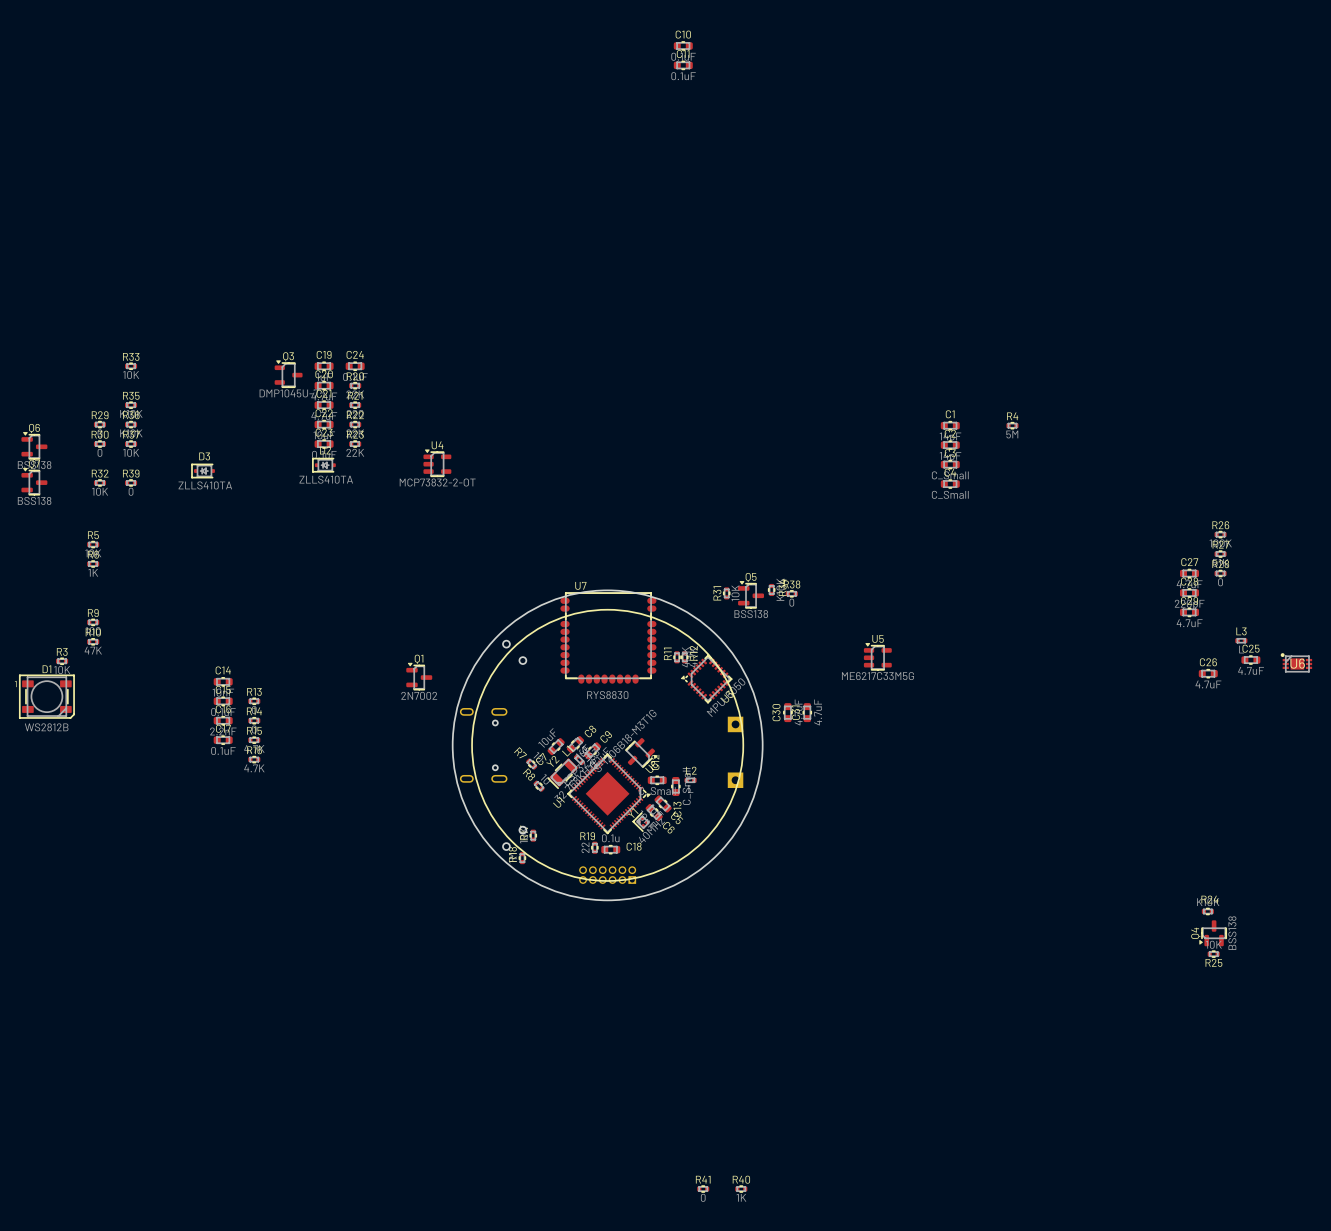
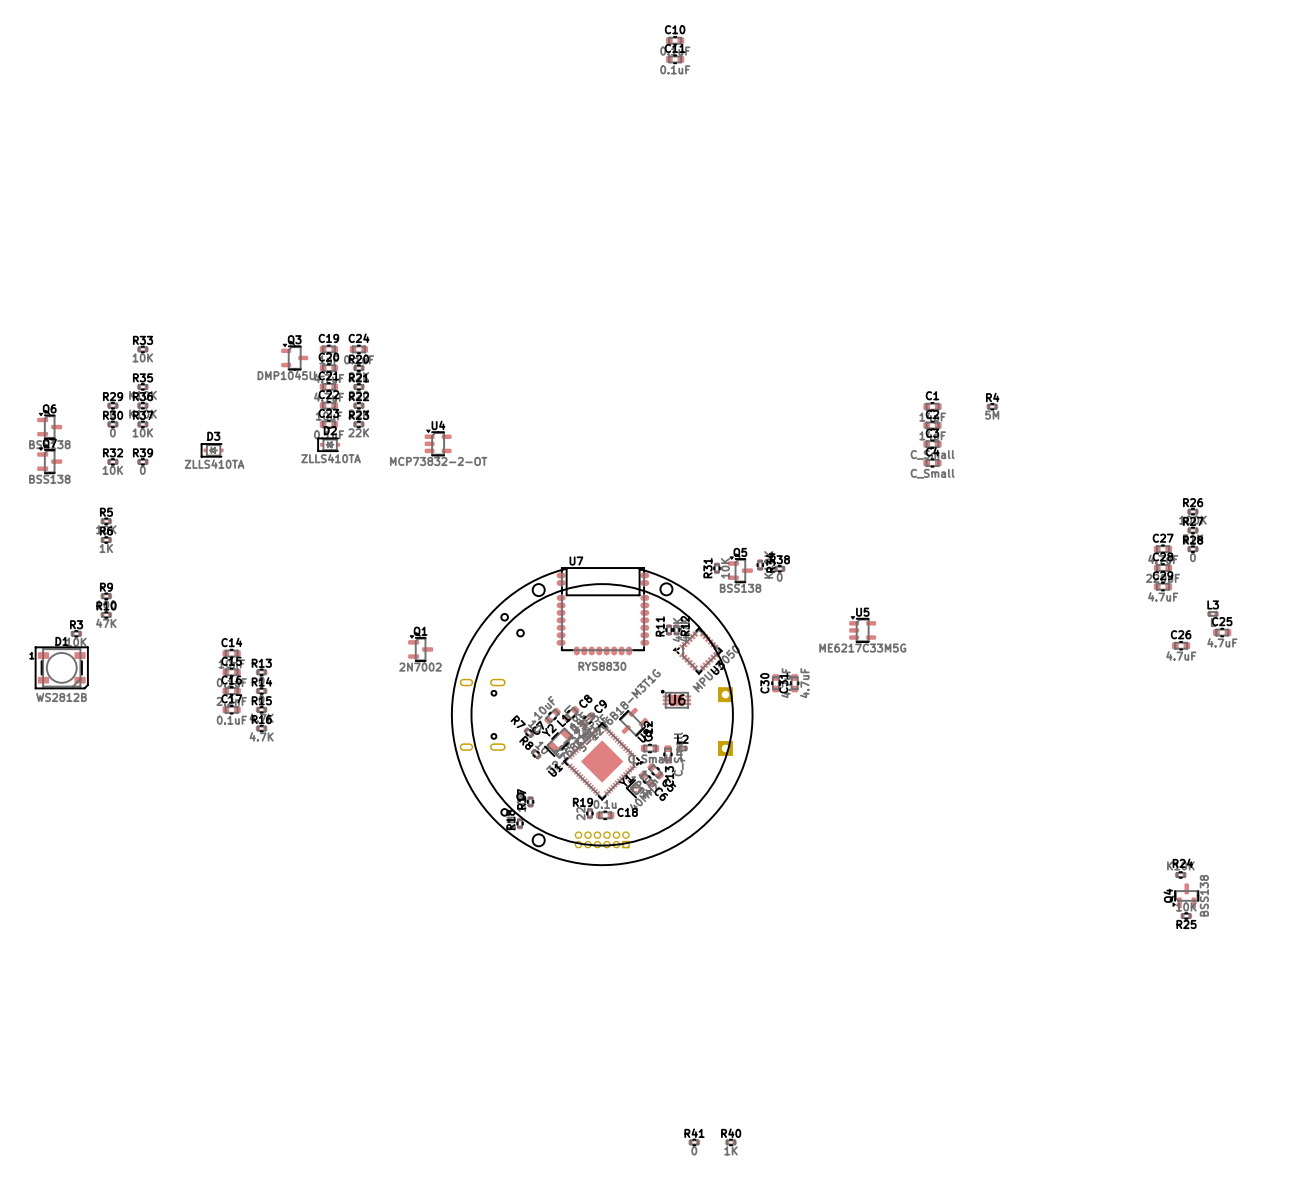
round board edge: [451, 589, 764, 902] -> none
board edge: none -> (566, 568) (566, 595) (639, 595) (639, 569) (664, 577) (679, 585) (700, 601) (724, 626) (741, 657) (748, 682) (752, 716) (749, 742) (742, 767) (727, 798) (710, 819) (683, 841) (660, 853) (635, 861) (601, 865) (575, 862) (550, 855) (526, 844) (505, 829) (481, 804) (464, 774) (455, 749) (452, 723) (452, 697) (460, 663) (471, 639) (486, 618) (511, 594) (541, 577) (566, 568)
round board edge: none -> [660, 582, 673, 596]
round board edge: none -> [532, 583, 546, 597]
U6 position: (1296, 662) -> (675, 698)
round board edge: none -> [532, 833, 546, 847]

